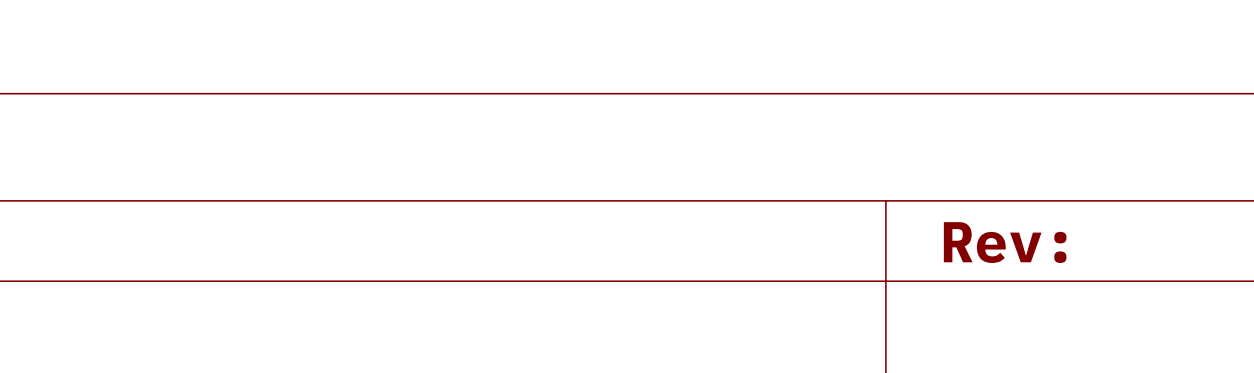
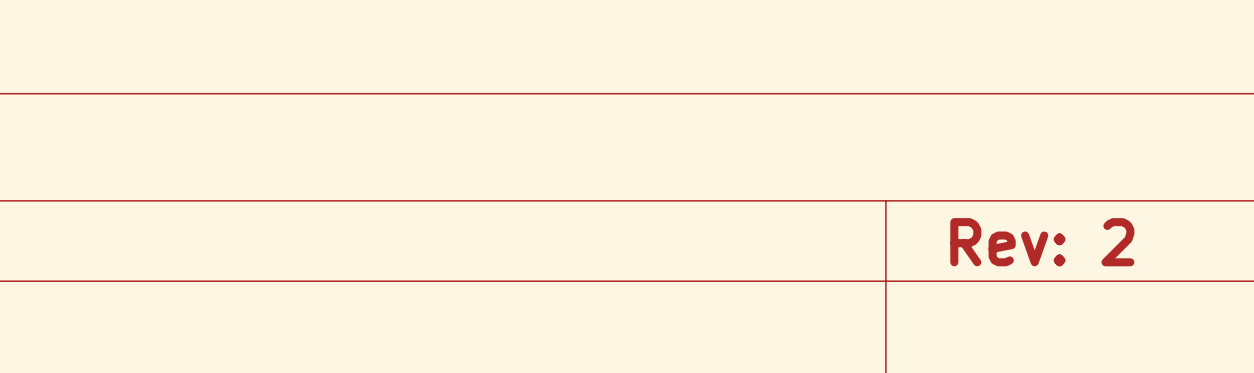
title block: Rev: (1005, 242) -> Rev: 2 (1042, 242)

